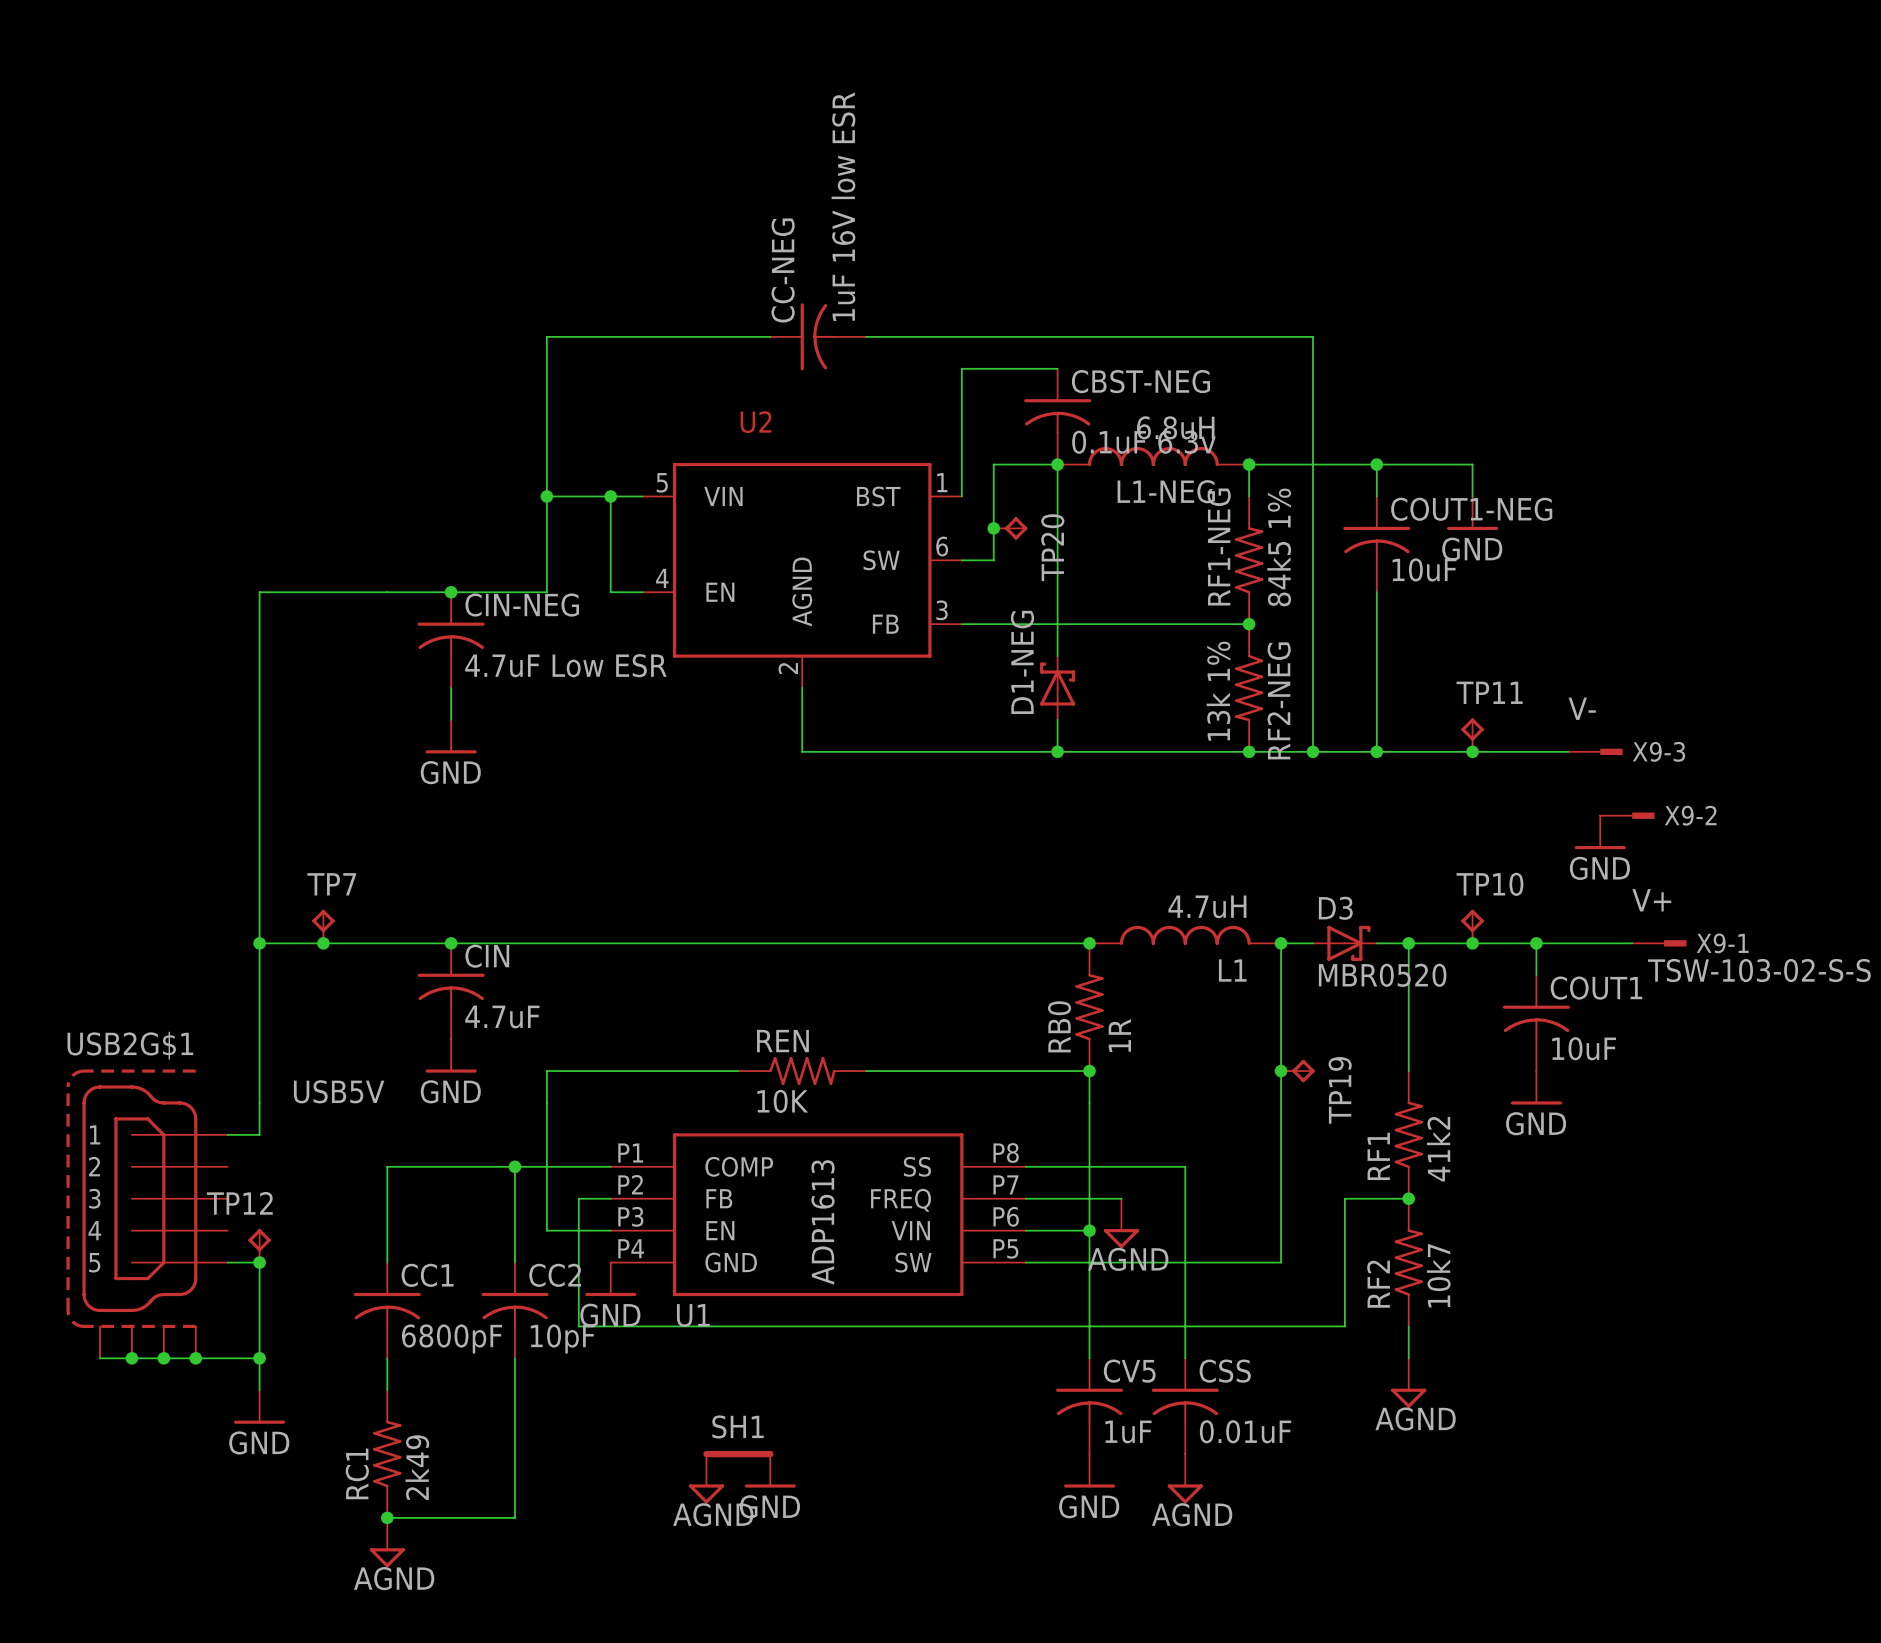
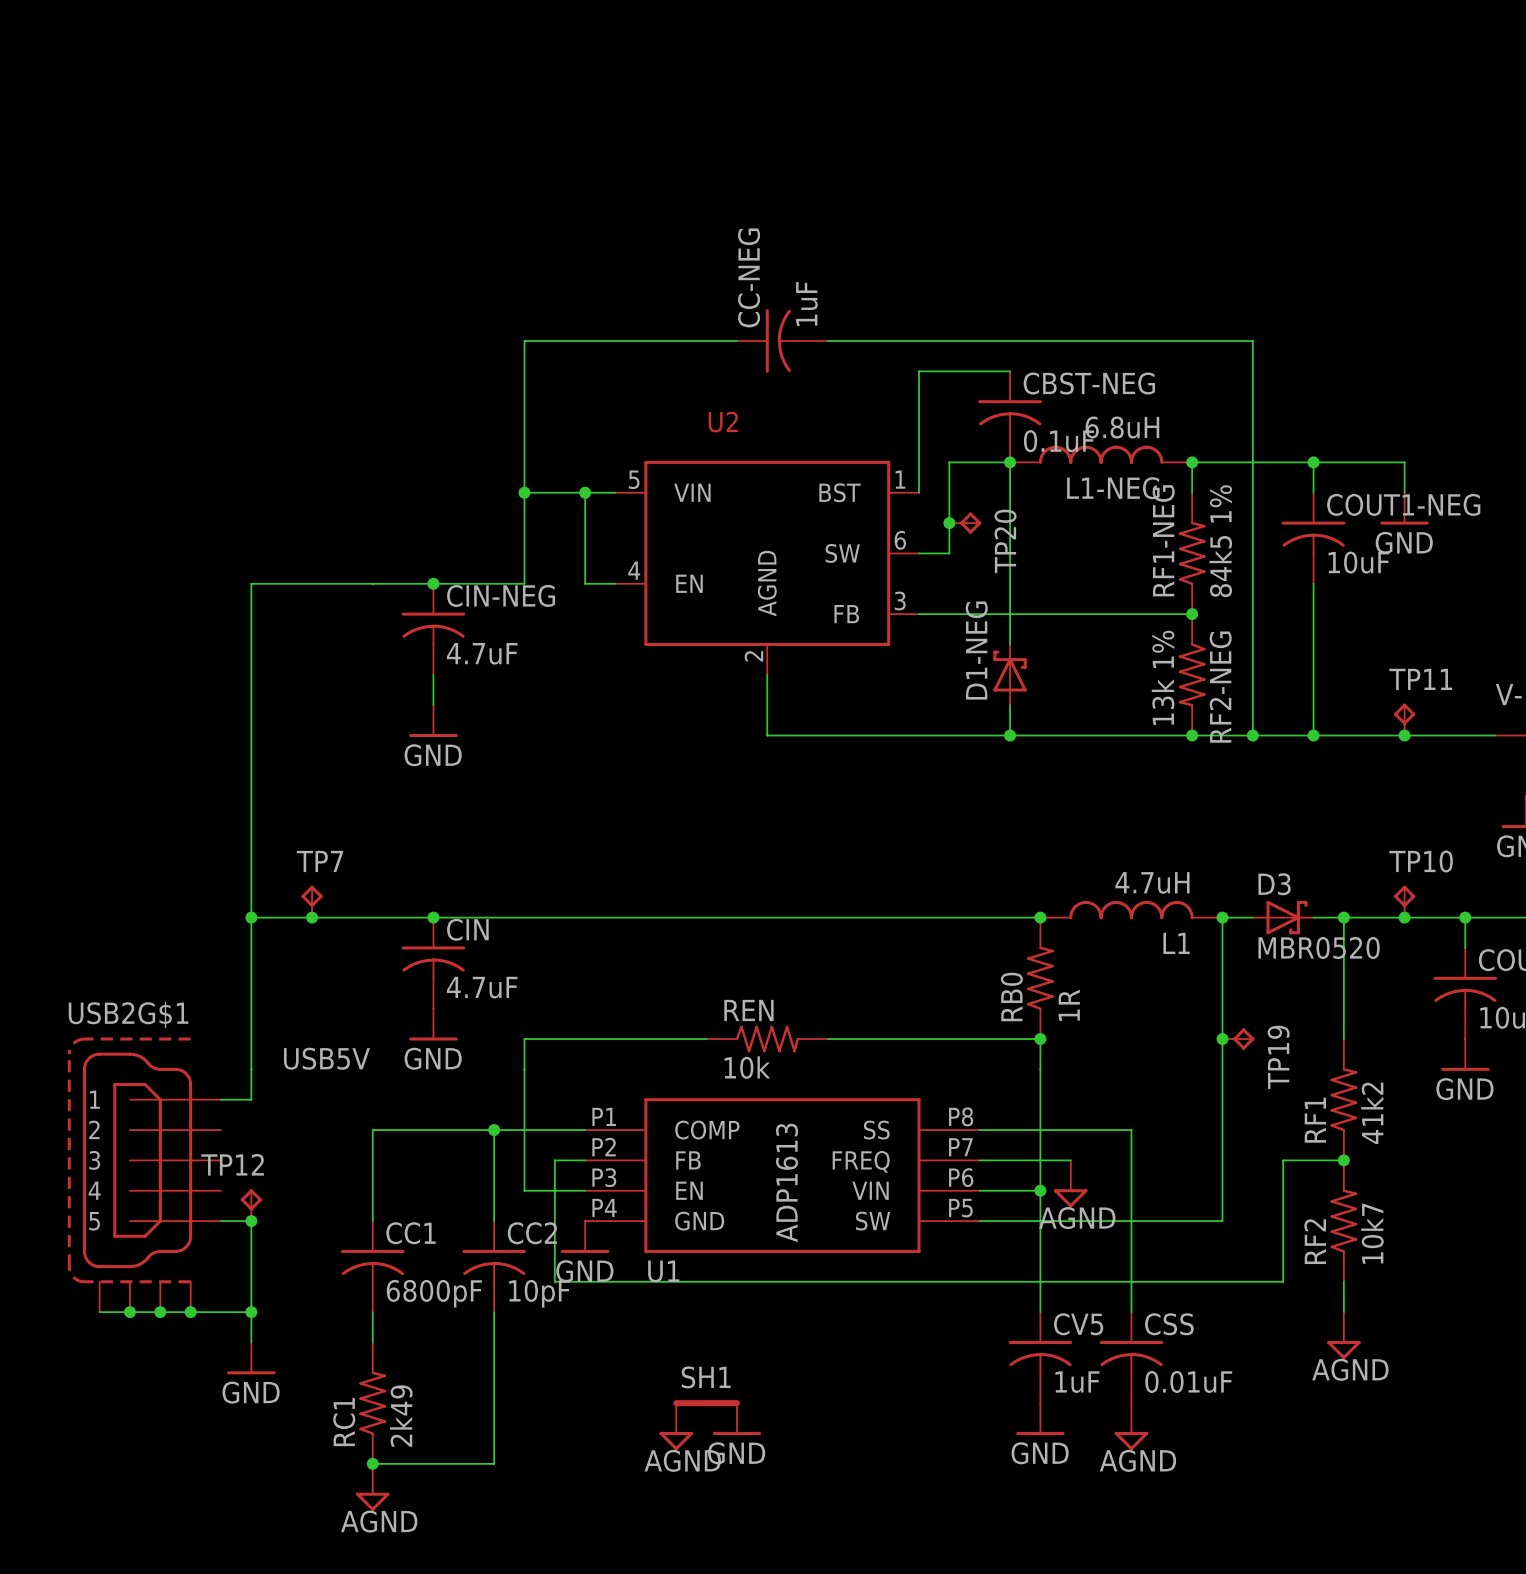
CC-NEG value: 1uF 16V low ESR (843, 206) -> 1uF (806, 304)
CBST-NEG value: 0.1uF 6.3v (1143, 442) -> 0.1uF (1059, 441)
CIN-NEG value: 4.7uF Low ESR (565, 665) -> 4.7uF (482, 653)
REN value: 10K (782, 1101) -> 10k (747, 1067)

